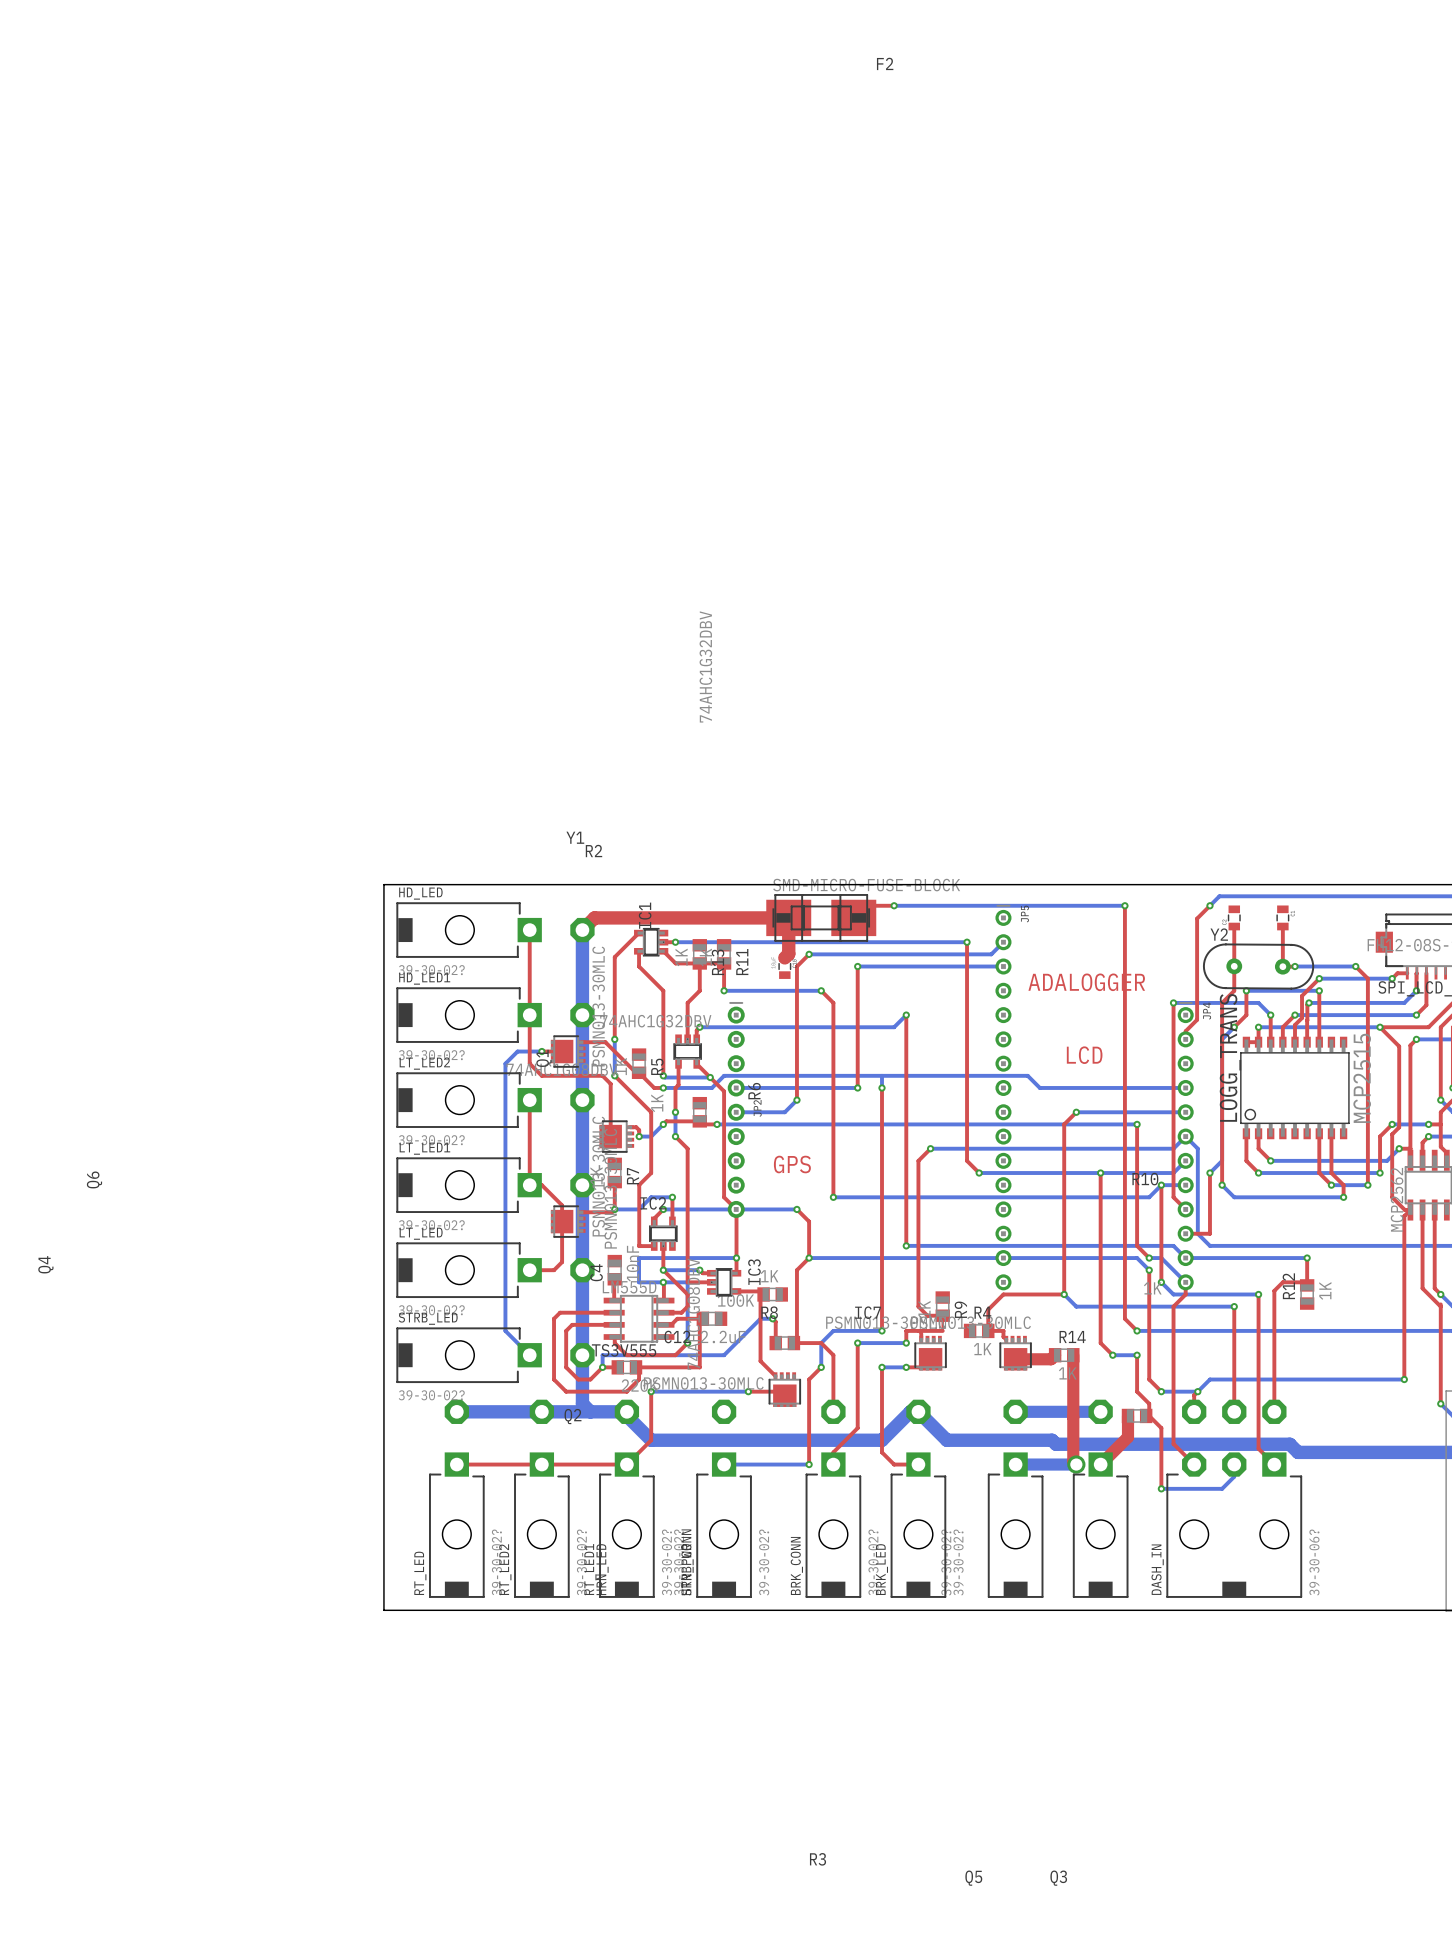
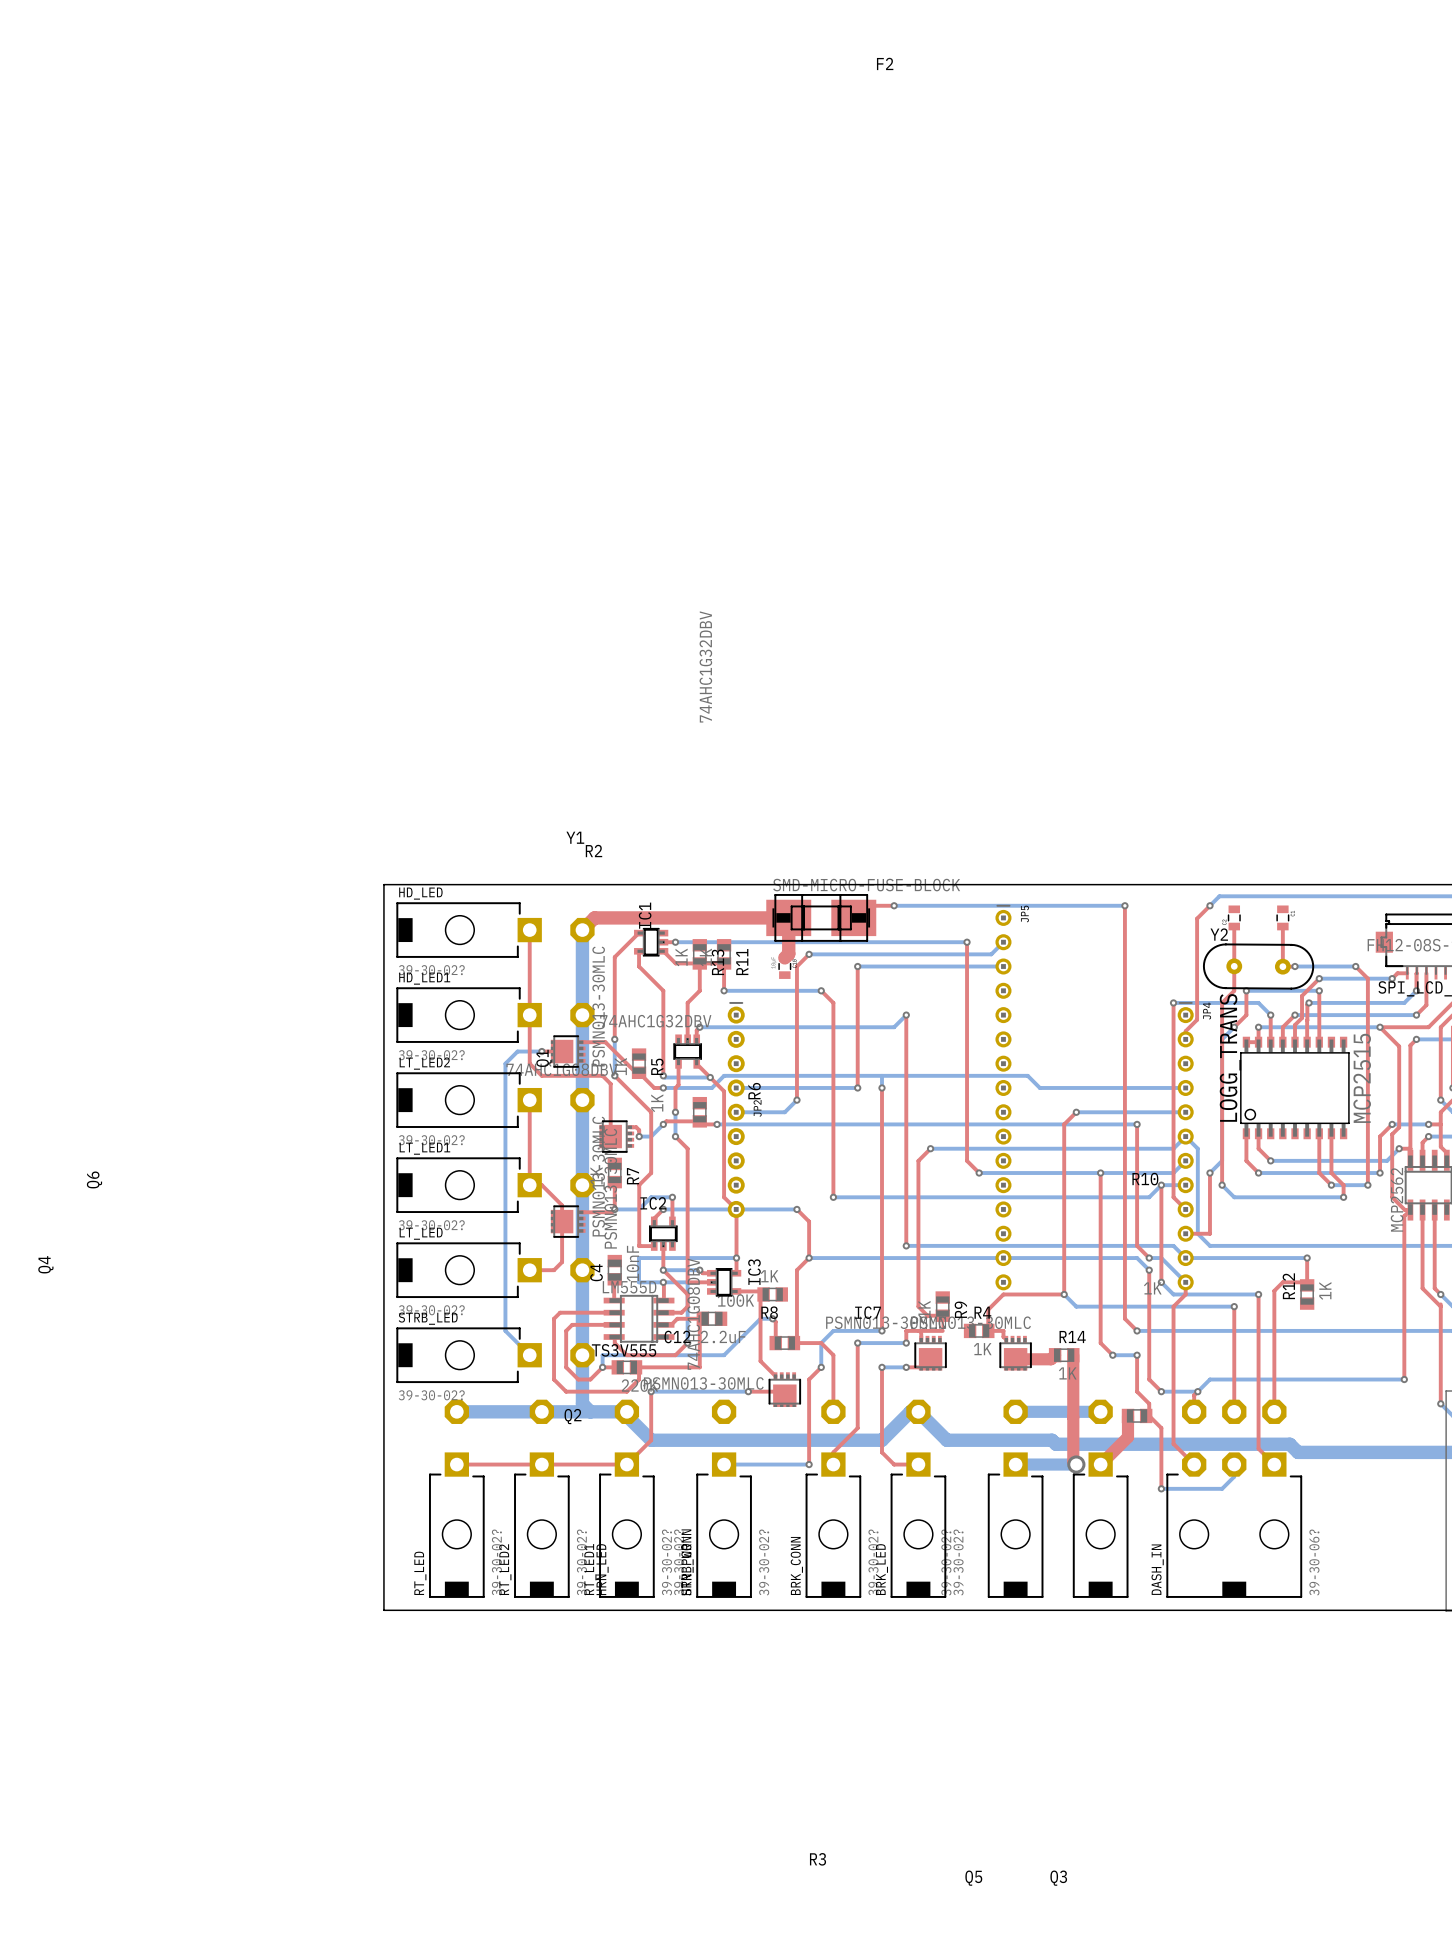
text: ADALOGGER (1086, 982) -> none
text: LCD (1084, 1055) -> none
text: GPS (792, 1164) -> none

